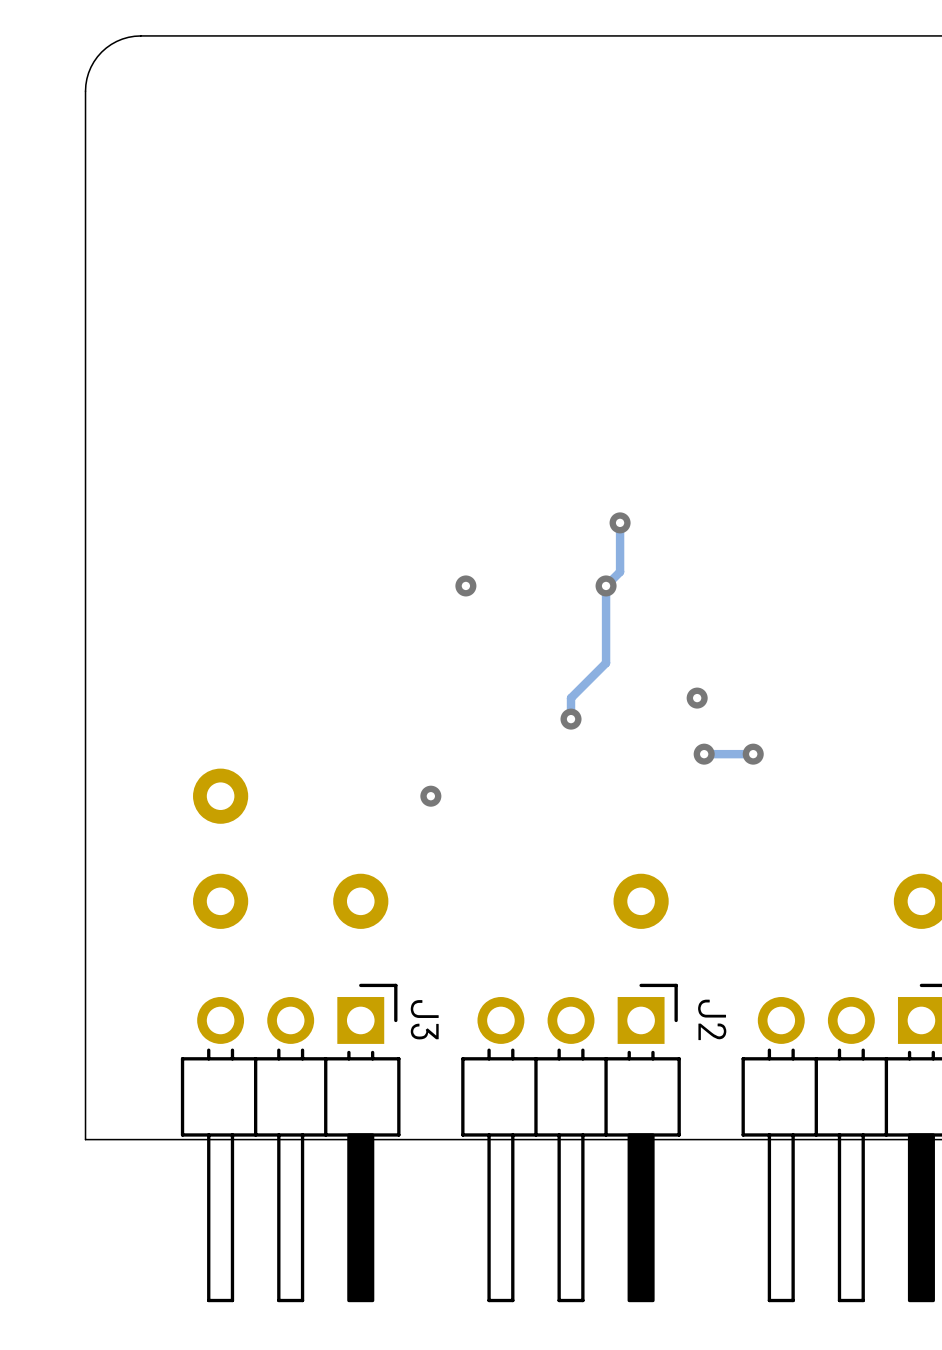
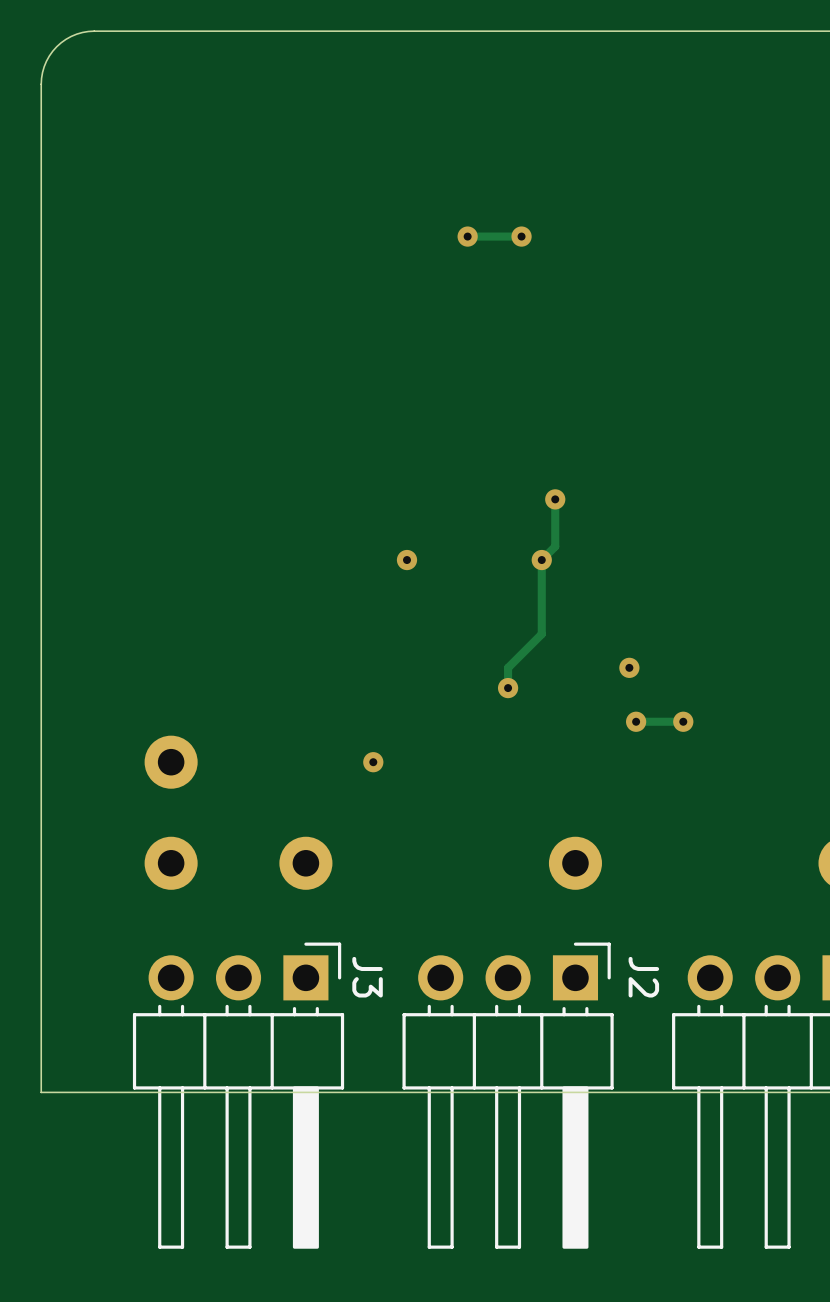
via: none -> (467, 236)
track: none -> (521, 236) (467, 236)
via: none -> (521, 236)

